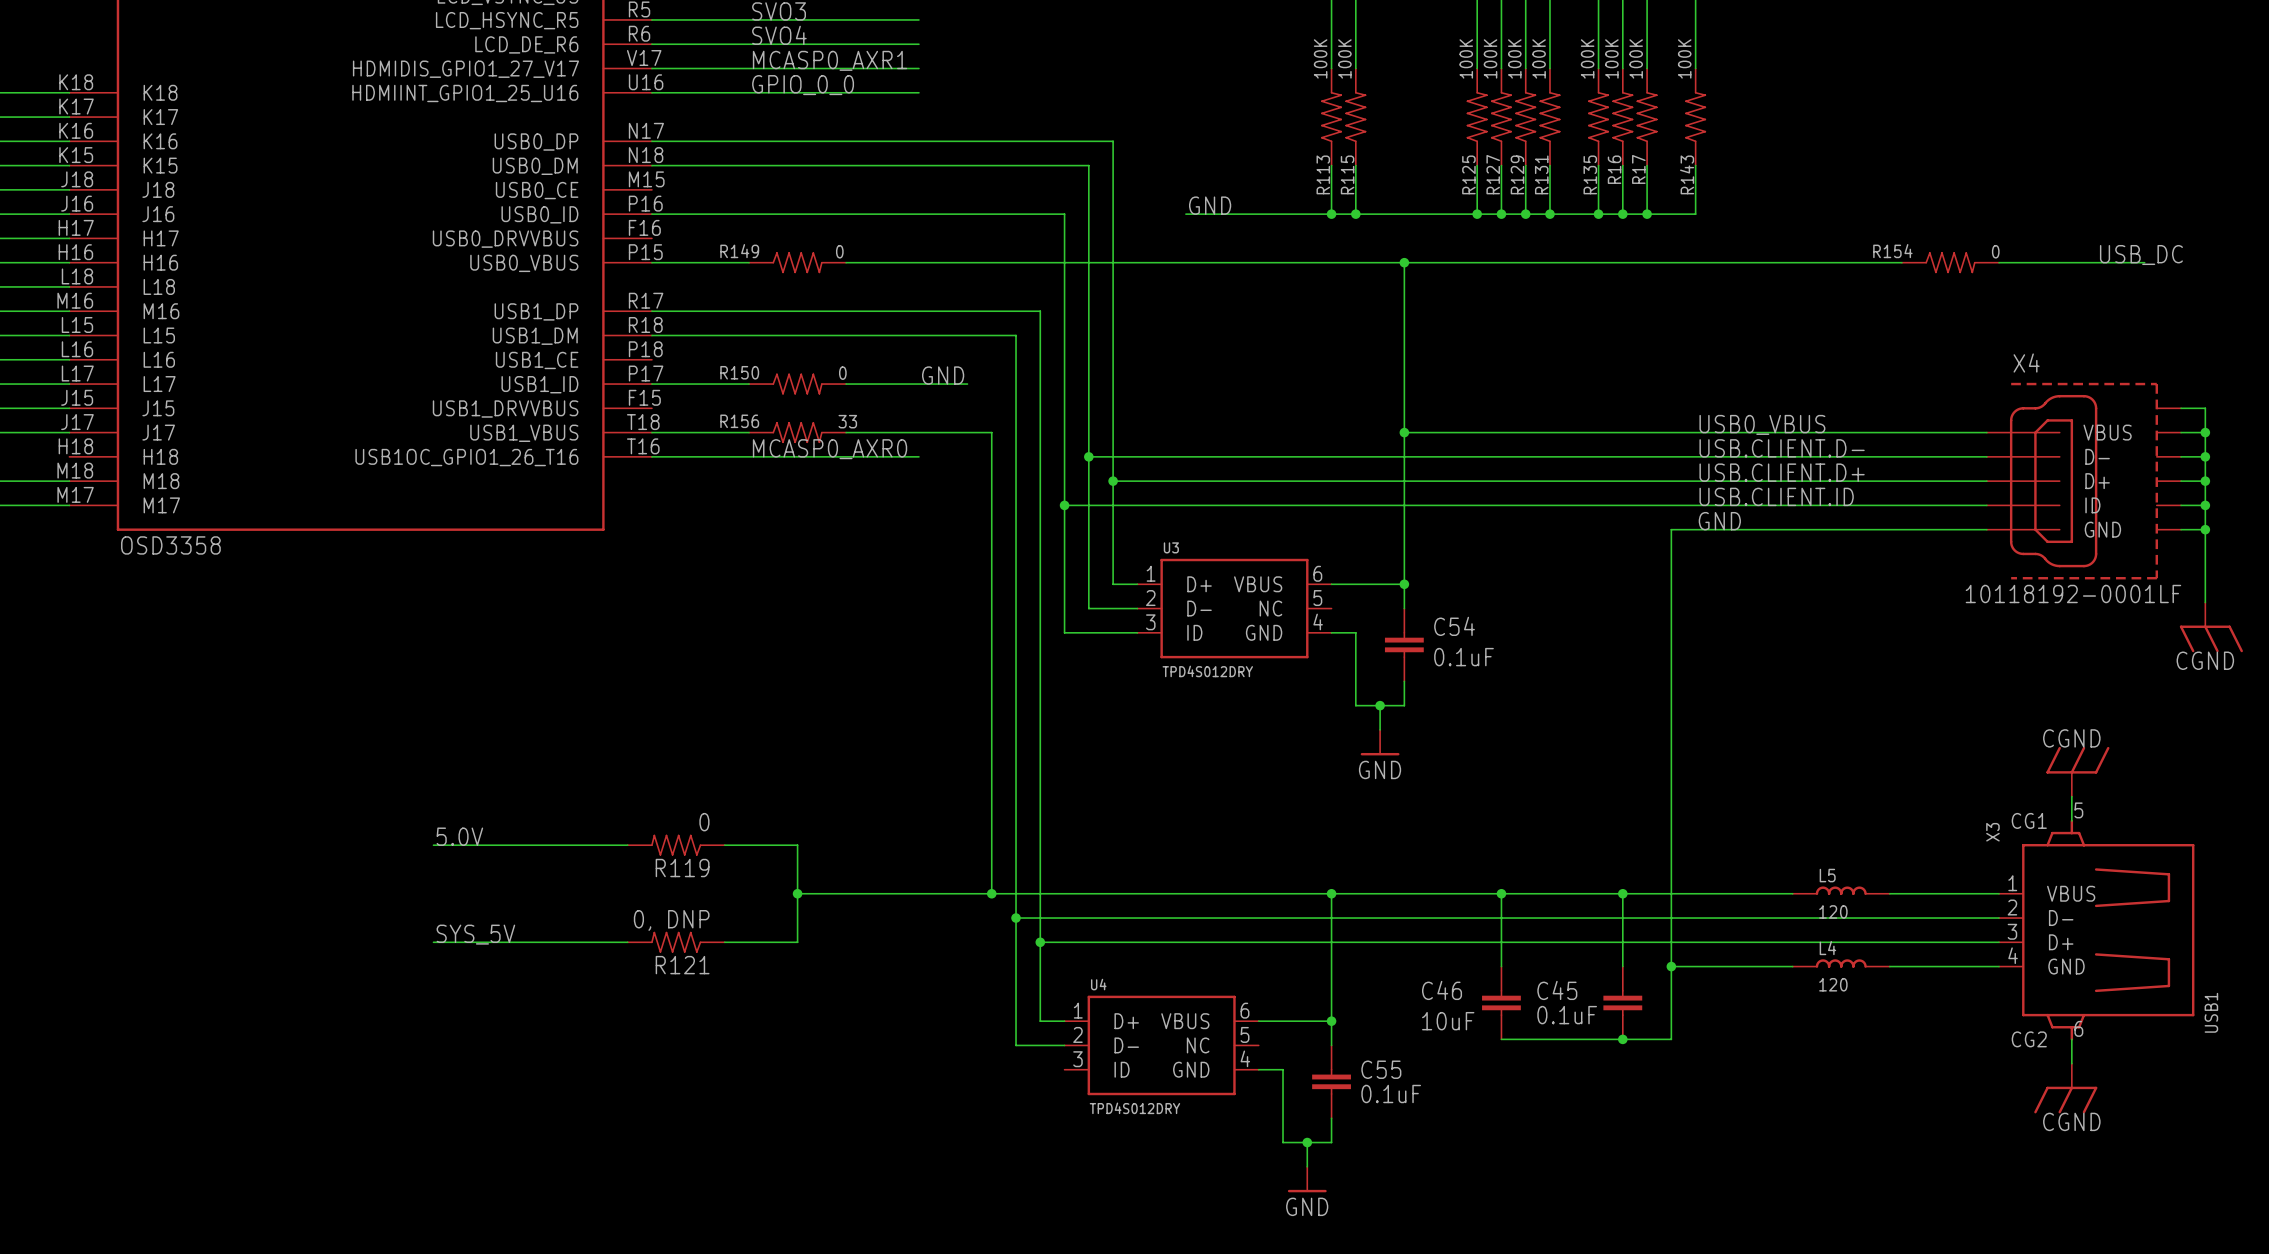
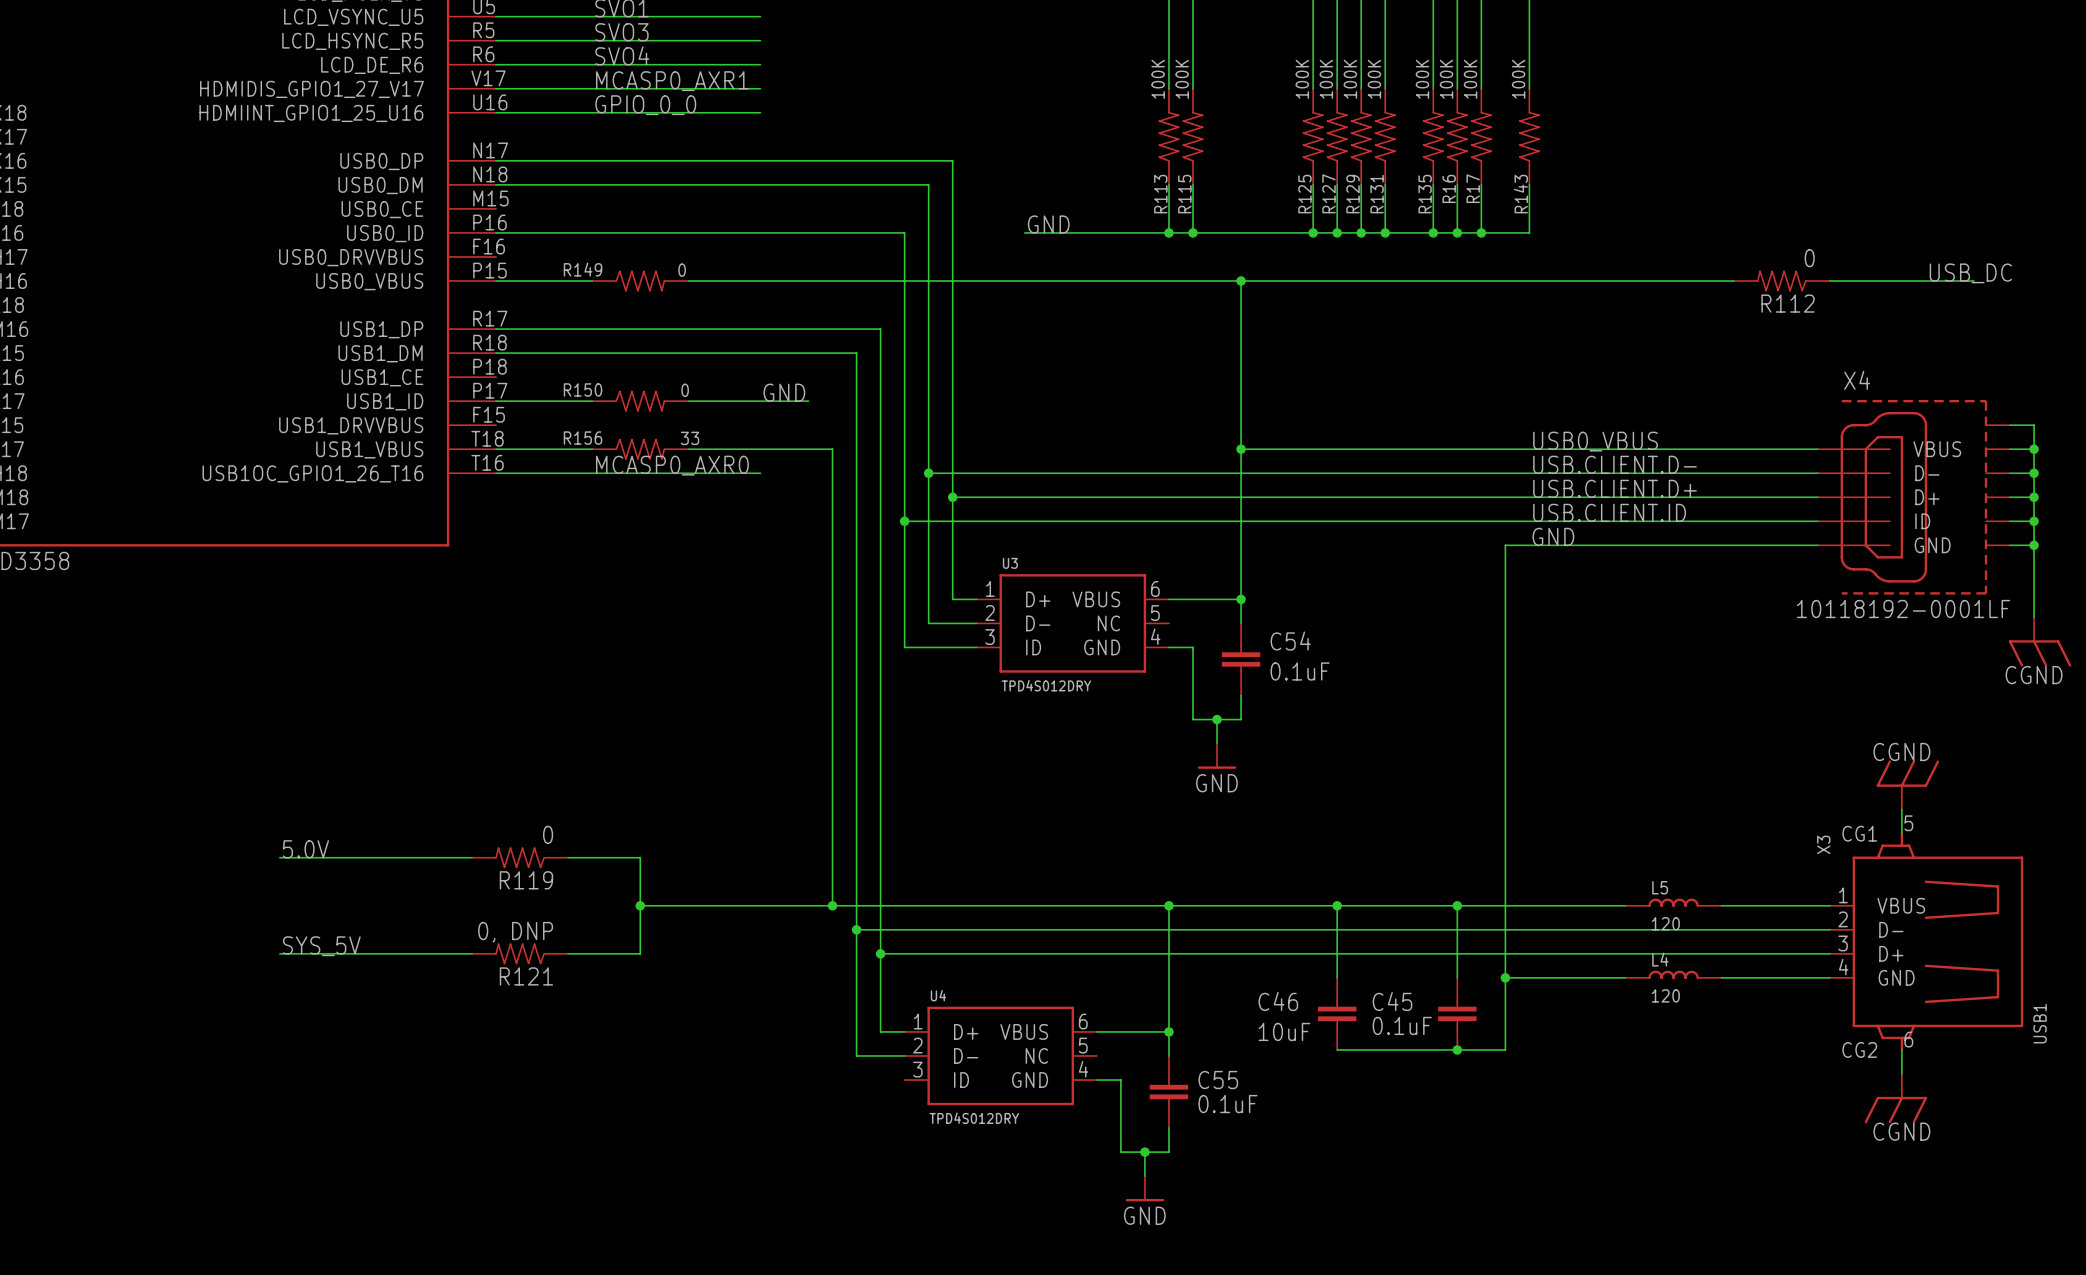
R154: 0 (1950, 262) -> none
R112: none -> 0 (1781, 280)

